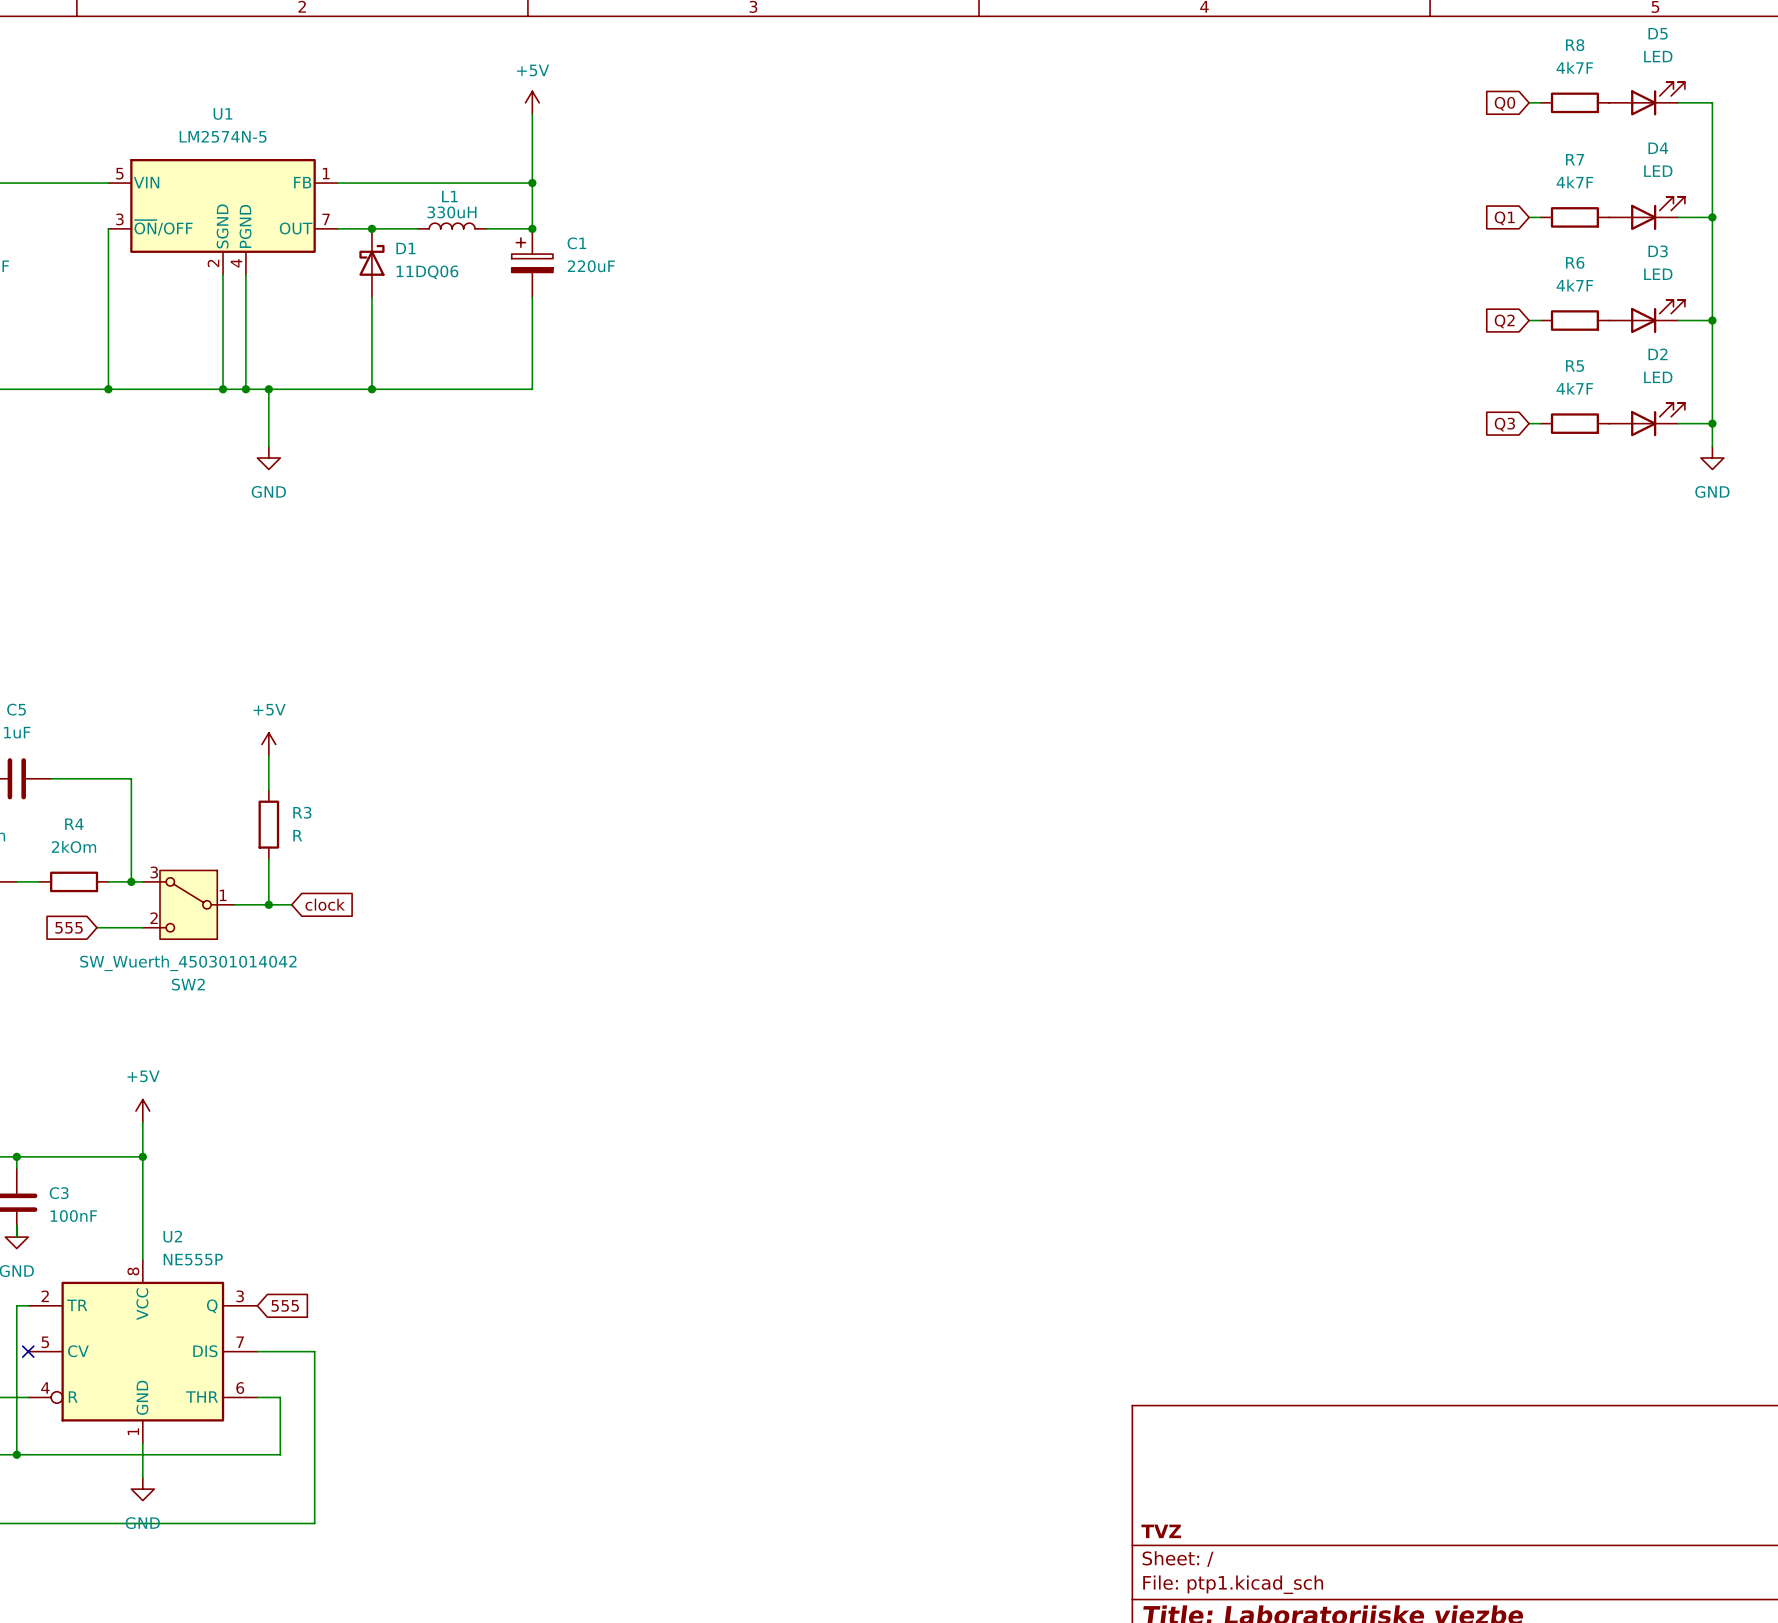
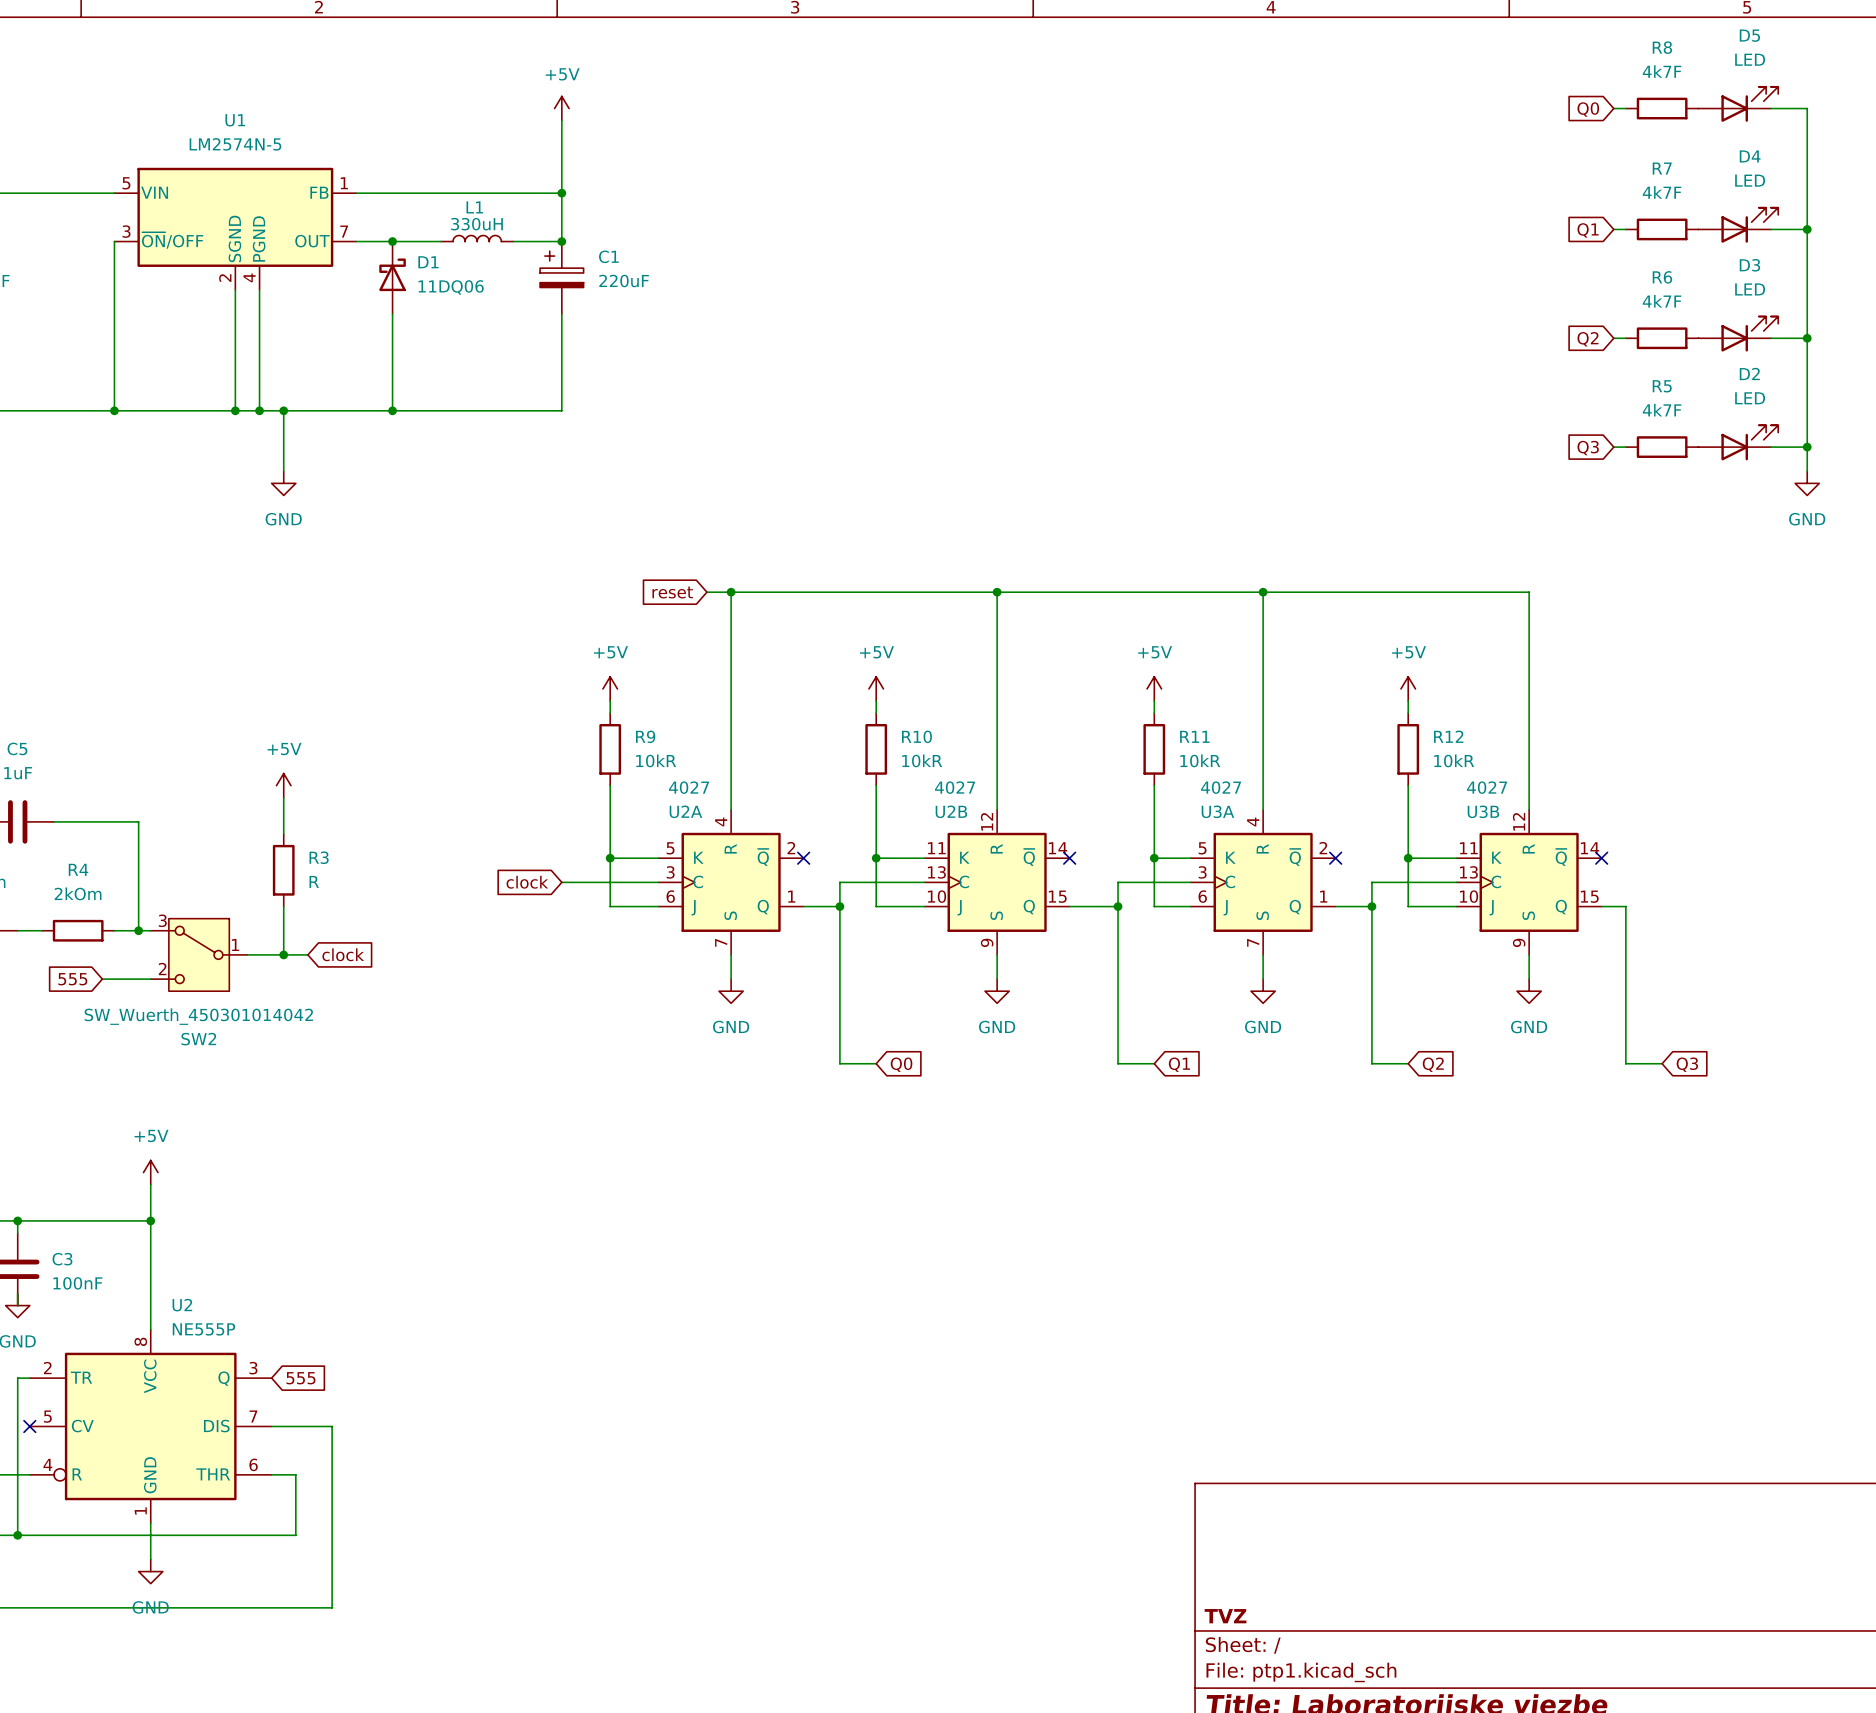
global label: none -> reset (672, 592)
wire: none -> (706, 592) (1529, 592) (1529, 809)
wire: none -> (731, 592) (731, 809)
junction: none -> (731, 592)
wire: none -> (997, 592) (997, 809)
junction: none -> (997, 592)
wire: none -> (1263, 592) (1263, 809)
junction: none -> (1263, 592)
power symbol: none -> +5V (610, 688)
power symbol: none -> +5V (876, 688)
power symbol: none -> +5V (1154, 688)
power symbol: none -> +5V (1408, 688)
wire: none -> (610, 701) (610, 713)
wire: none -> (876, 701) (876, 713)
wire: none -> (1154, 701) (1154, 713)
wire: none -> (1408, 701) (1408, 713)
R9: none -> 10kR (610, 749)
R10: none -> 10kR (876, 749)
R11: none -> 10kR (1154, 749)
R12: none -> 10kR (1408, 749)
wire: none -> (610, 785) (610, 906) (658, 906)
wire: none -> (876, 785) (876, 906) (924, 906)
wire: none -> (1154, 785) (1154, 906) (1190, 906)
wire: none -> (1408, 785) (1408, 906) (1456, 906)
wire: none -> (610, 858) (658, 858)
junction: none -> (610, 858)
no-connect mark: none -> (803, 858)
wire: none -> (876, 858) (924, 858)
junction: none -> (876, 858)
no-connect mark: none -> (1069, 858)
wire: none -> (1154, 858) (1190, 858)
junction: none -> (1154, 858)
no-connect mark: none -> (1335, 858)
wire: none -> (1408, 858) (1456, 858)
junction: none -> (1408, 858)
no-connect mark: none -> (1601, 858)
global label: none -> clock (527, 882)
wire: none -> (561, 882) (658, 882)
U2A: none -> 4027 (731, 882)
wire: none -> (924, 882) (839, 882) (839, 1063) (876, 1063)
U2B: none -> 4027 (997, 882)
wire: none -> (1190, 882) (1118, 882) (1118, 1063) (1154, 1063)
U3A: none -> 4027 (1263, 882)
wire: none -> (1456, 882) (1371, 882) (1371, 1063) (1408, 1063)
U3B: none -> 4027 (1529, 882)
wire: none -> (803, 906) (839, 906)
junction: none -> (839, 906)
wire: none -> (1069, 906) (1118, 906)
junction: none -> (1118, 906)
wire: none -> (1335, 906) (1371, 906)
junction: none -> (1371, 906)
wire: none -> (1601, 906) (1625, 906) (1625, 1063) (1662, 1063)
wire: none -> (731, 954) (731, 979)
wire: none -> (997, 954) (997, 979)
wire: none -> (1263, 954) (1263, 979)
wire: none -> (1529, 954) (1529, 979)
power symbol: none -> GND (731, 991)
power symbol: none -> GND (997, 991)
power symbol: none -> GND (1263, 991)
power symbol: none -> GND (1529, 991)
global label: none -> Q0 (901, 1064)
global label: none -> Q1 (1179, 1064)
global label: none -> Q2 (1433, 1064)
global label: none -> Q3 (1687, 1064)

